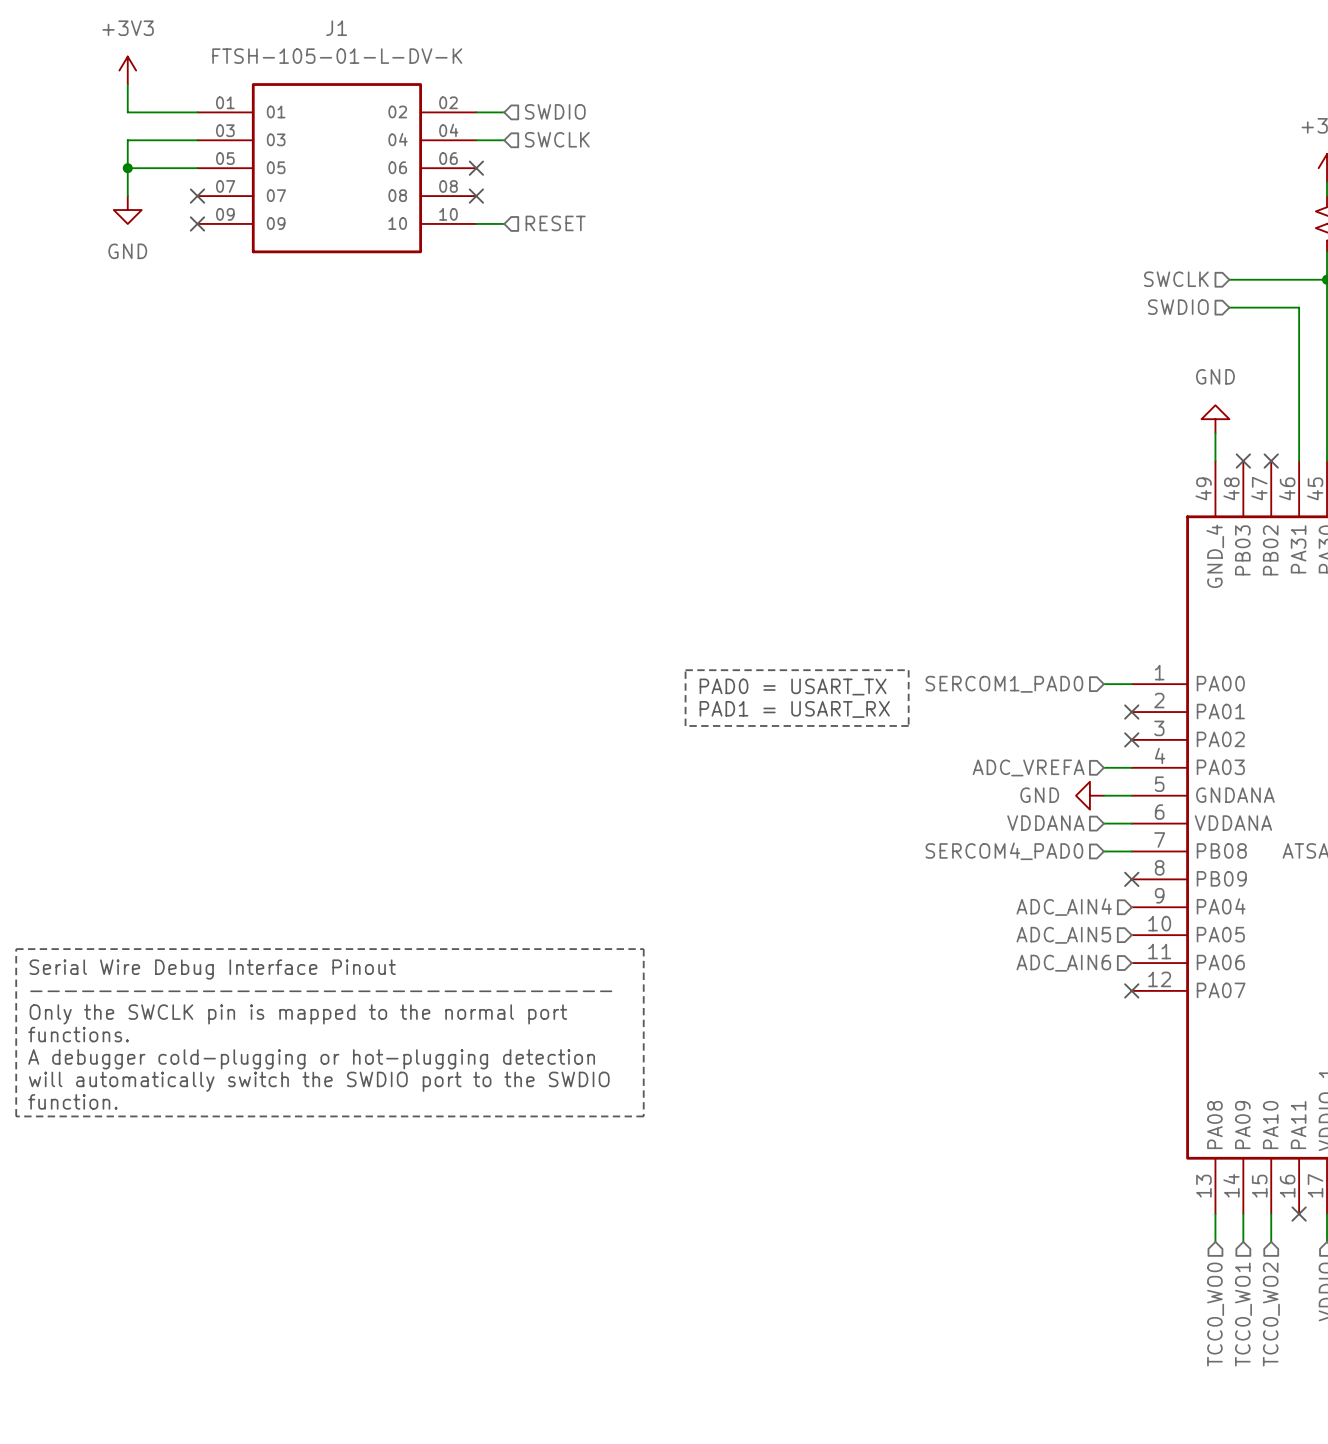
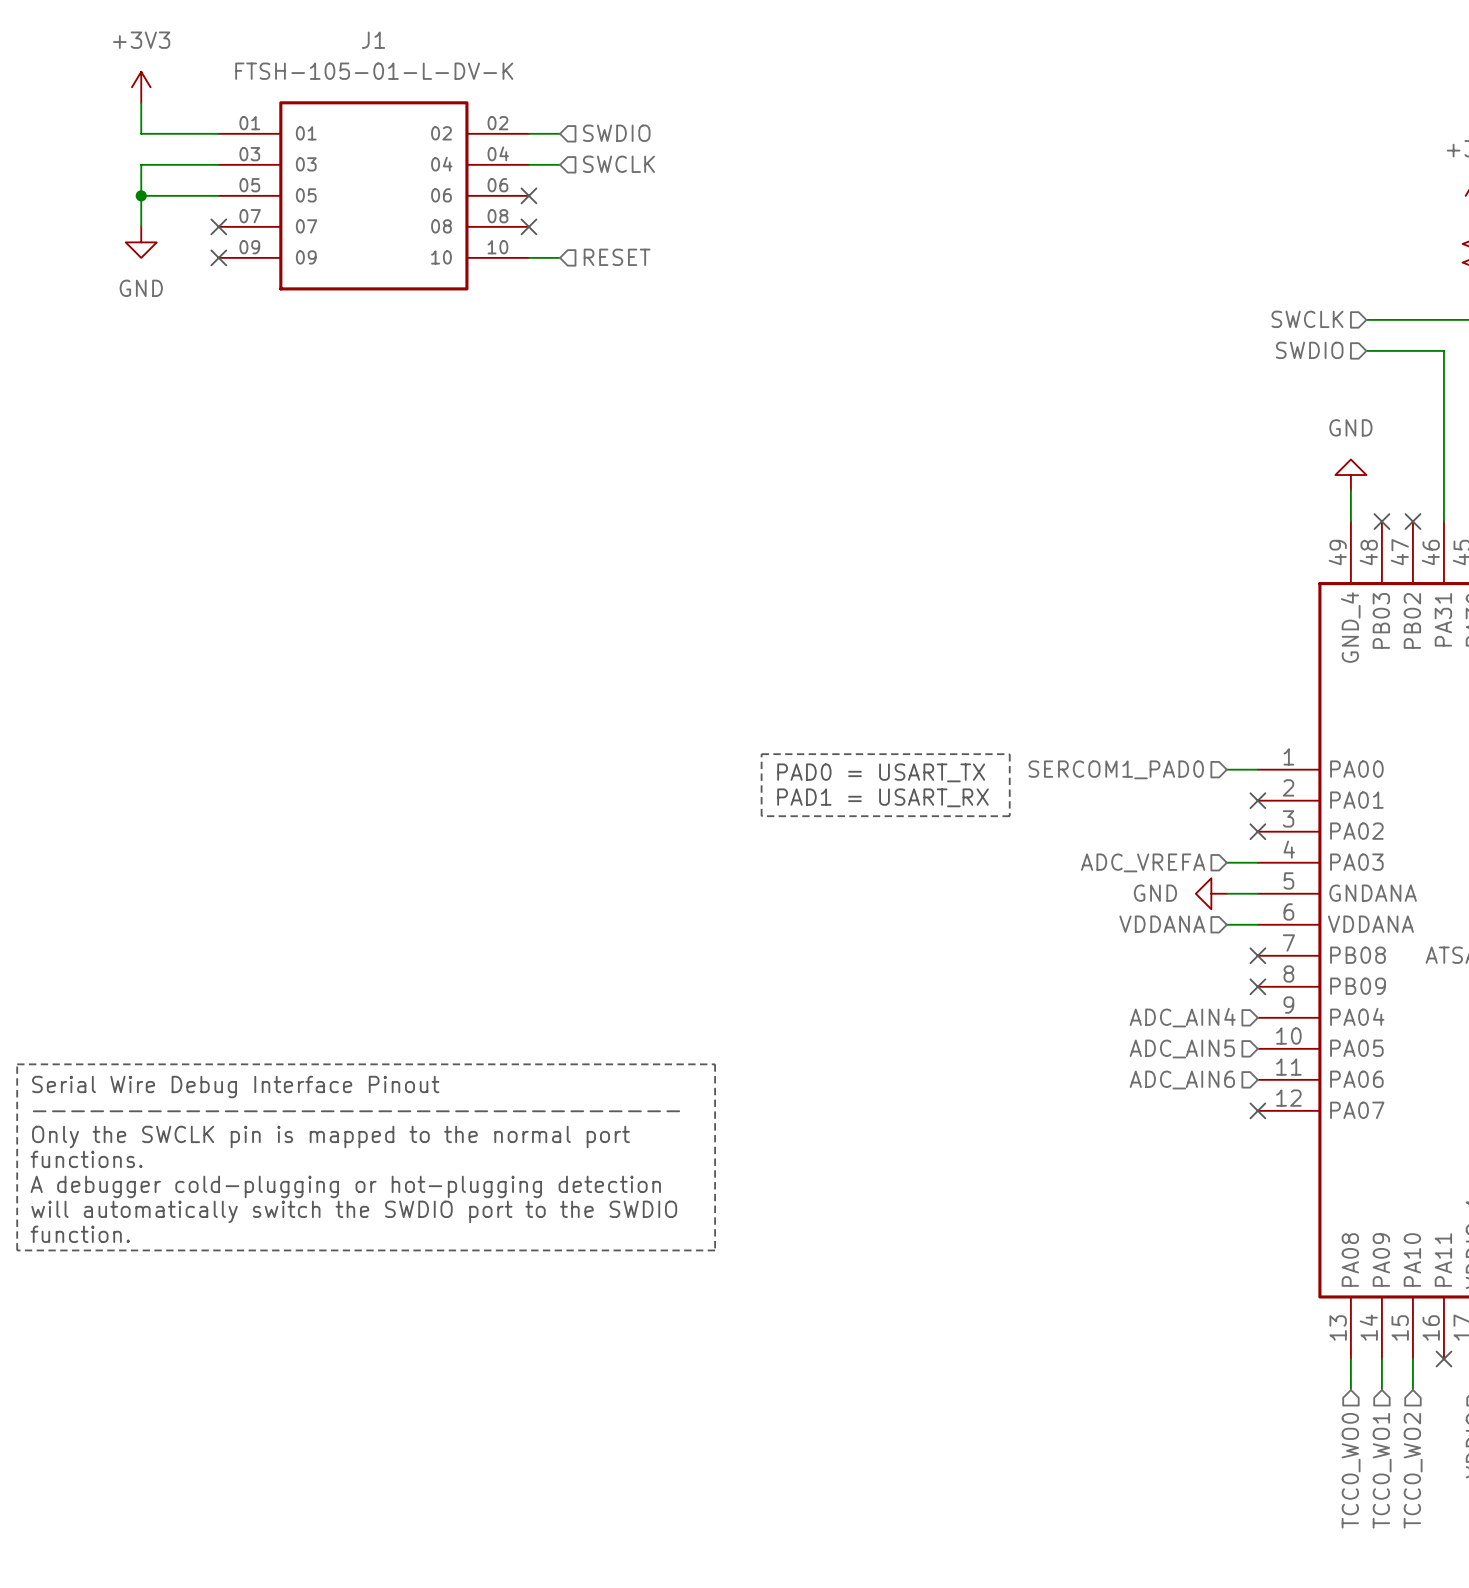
hierarchical label: SERCOM4_PAD0 (1004, 851) -> none
wire: (1103, 851) (1131, 851) -> none
no-connect mark: none -> (1257, 955)

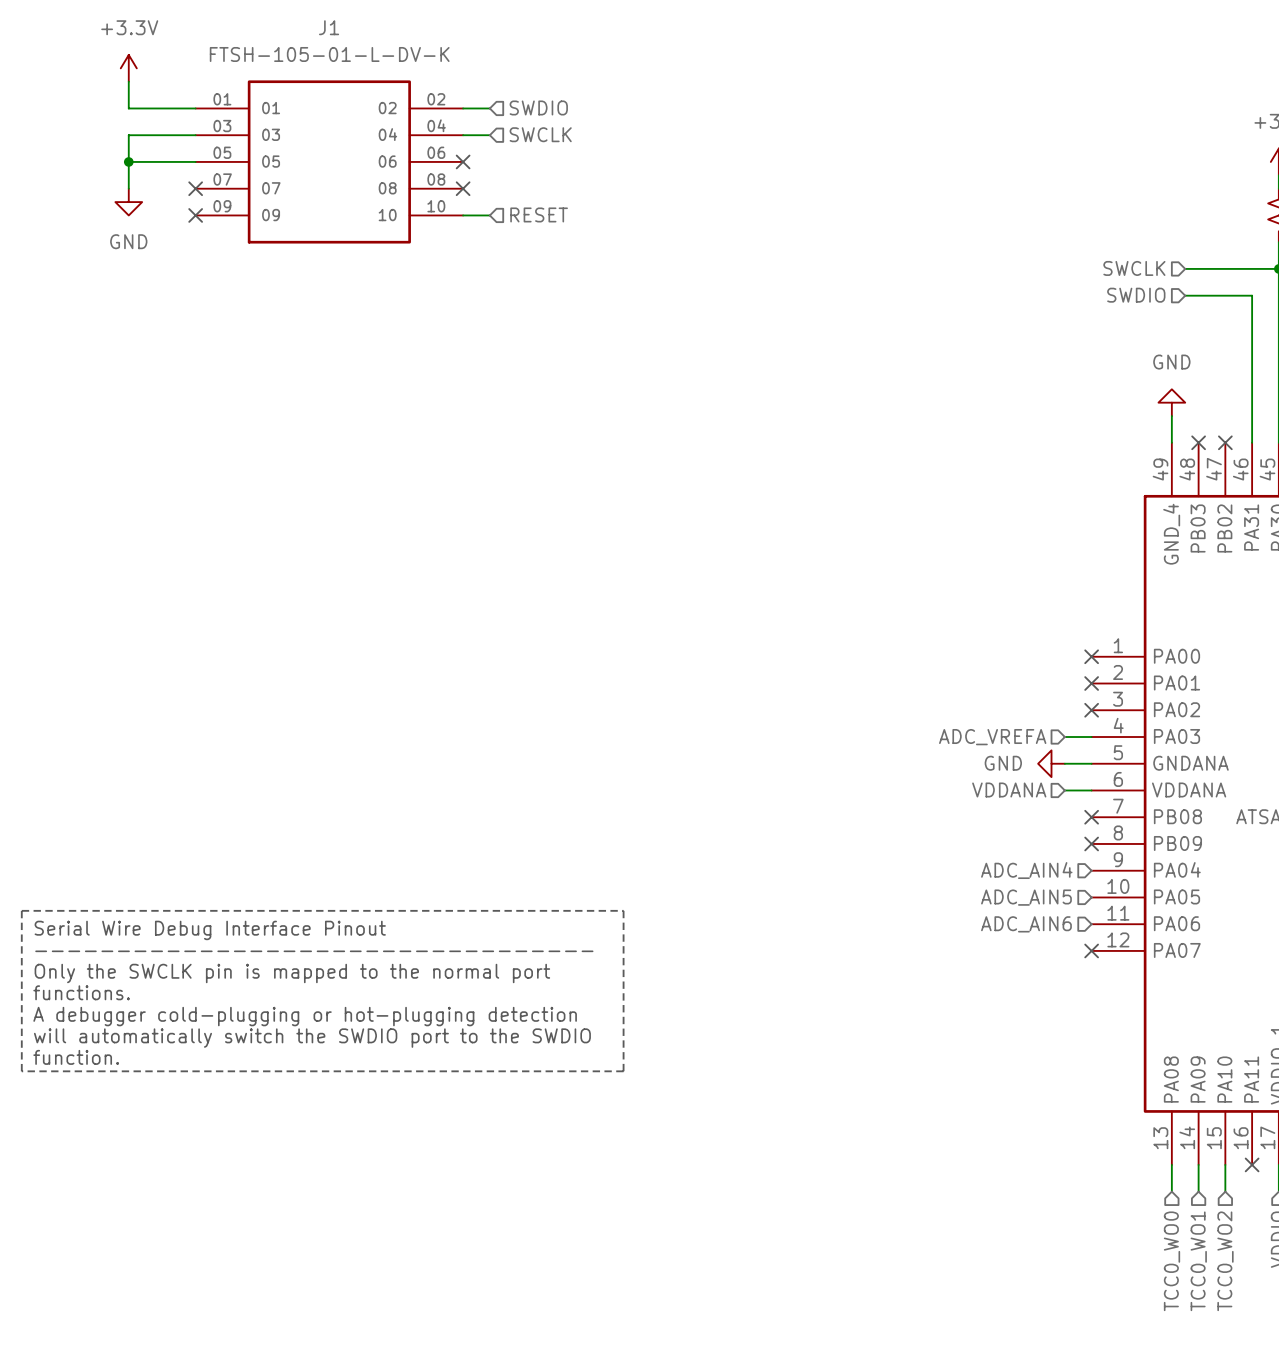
power symbol: +3V3 (141, 87) -> +3.3V (128, 68)
line: (761, 754) (1009, 754) (1009, 816) (761, 816) (761, 754) -> none
hierarchical label: SERCOM1_PAD0 (1116, 769) -> none
wire: (1226, 769) (1257, 769) -> none
no-connect mark: none -> (1091, 656)
text: PAD0 = USART_TX (881, 772) -> none
text: PAD1 = USART_RX (883, 797) -> none

